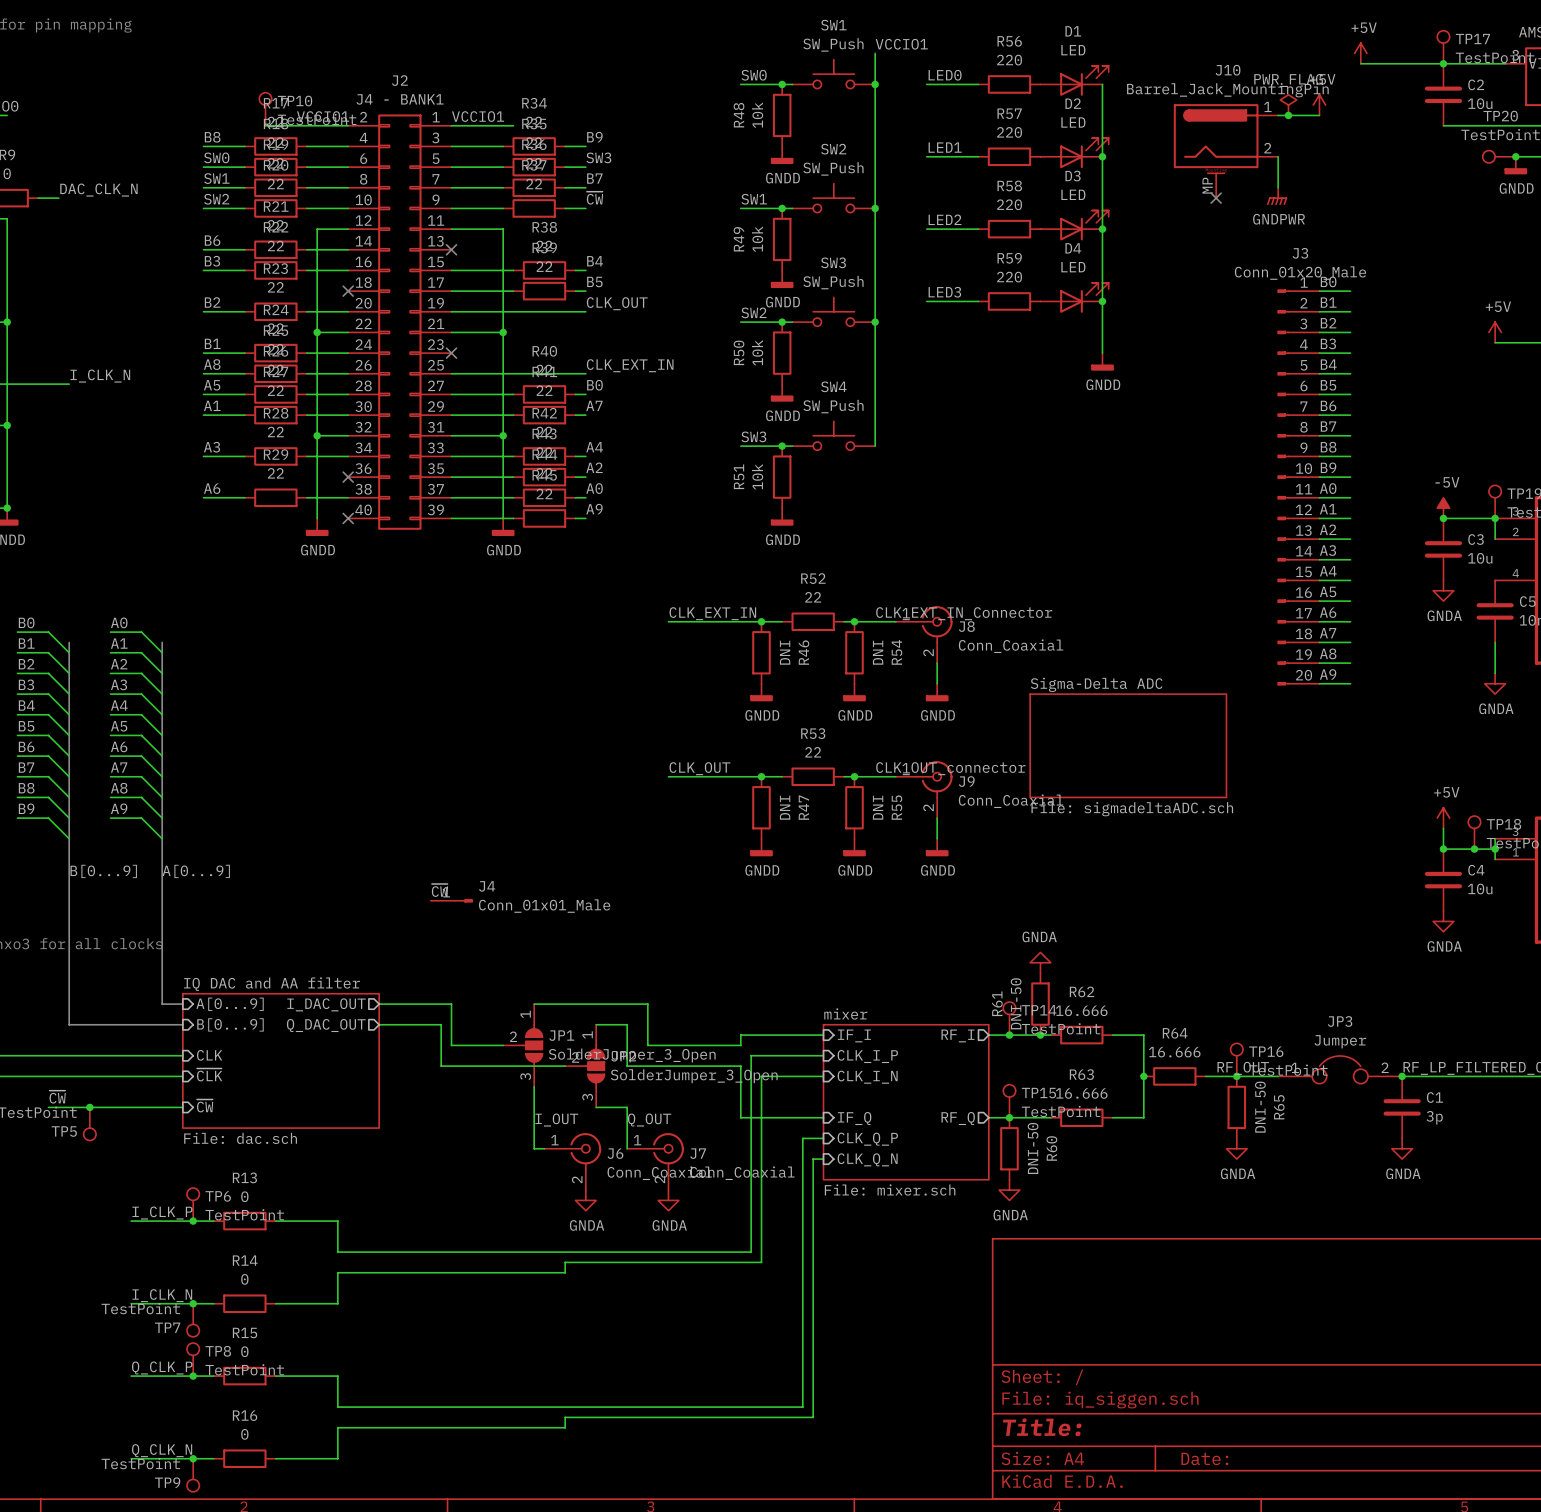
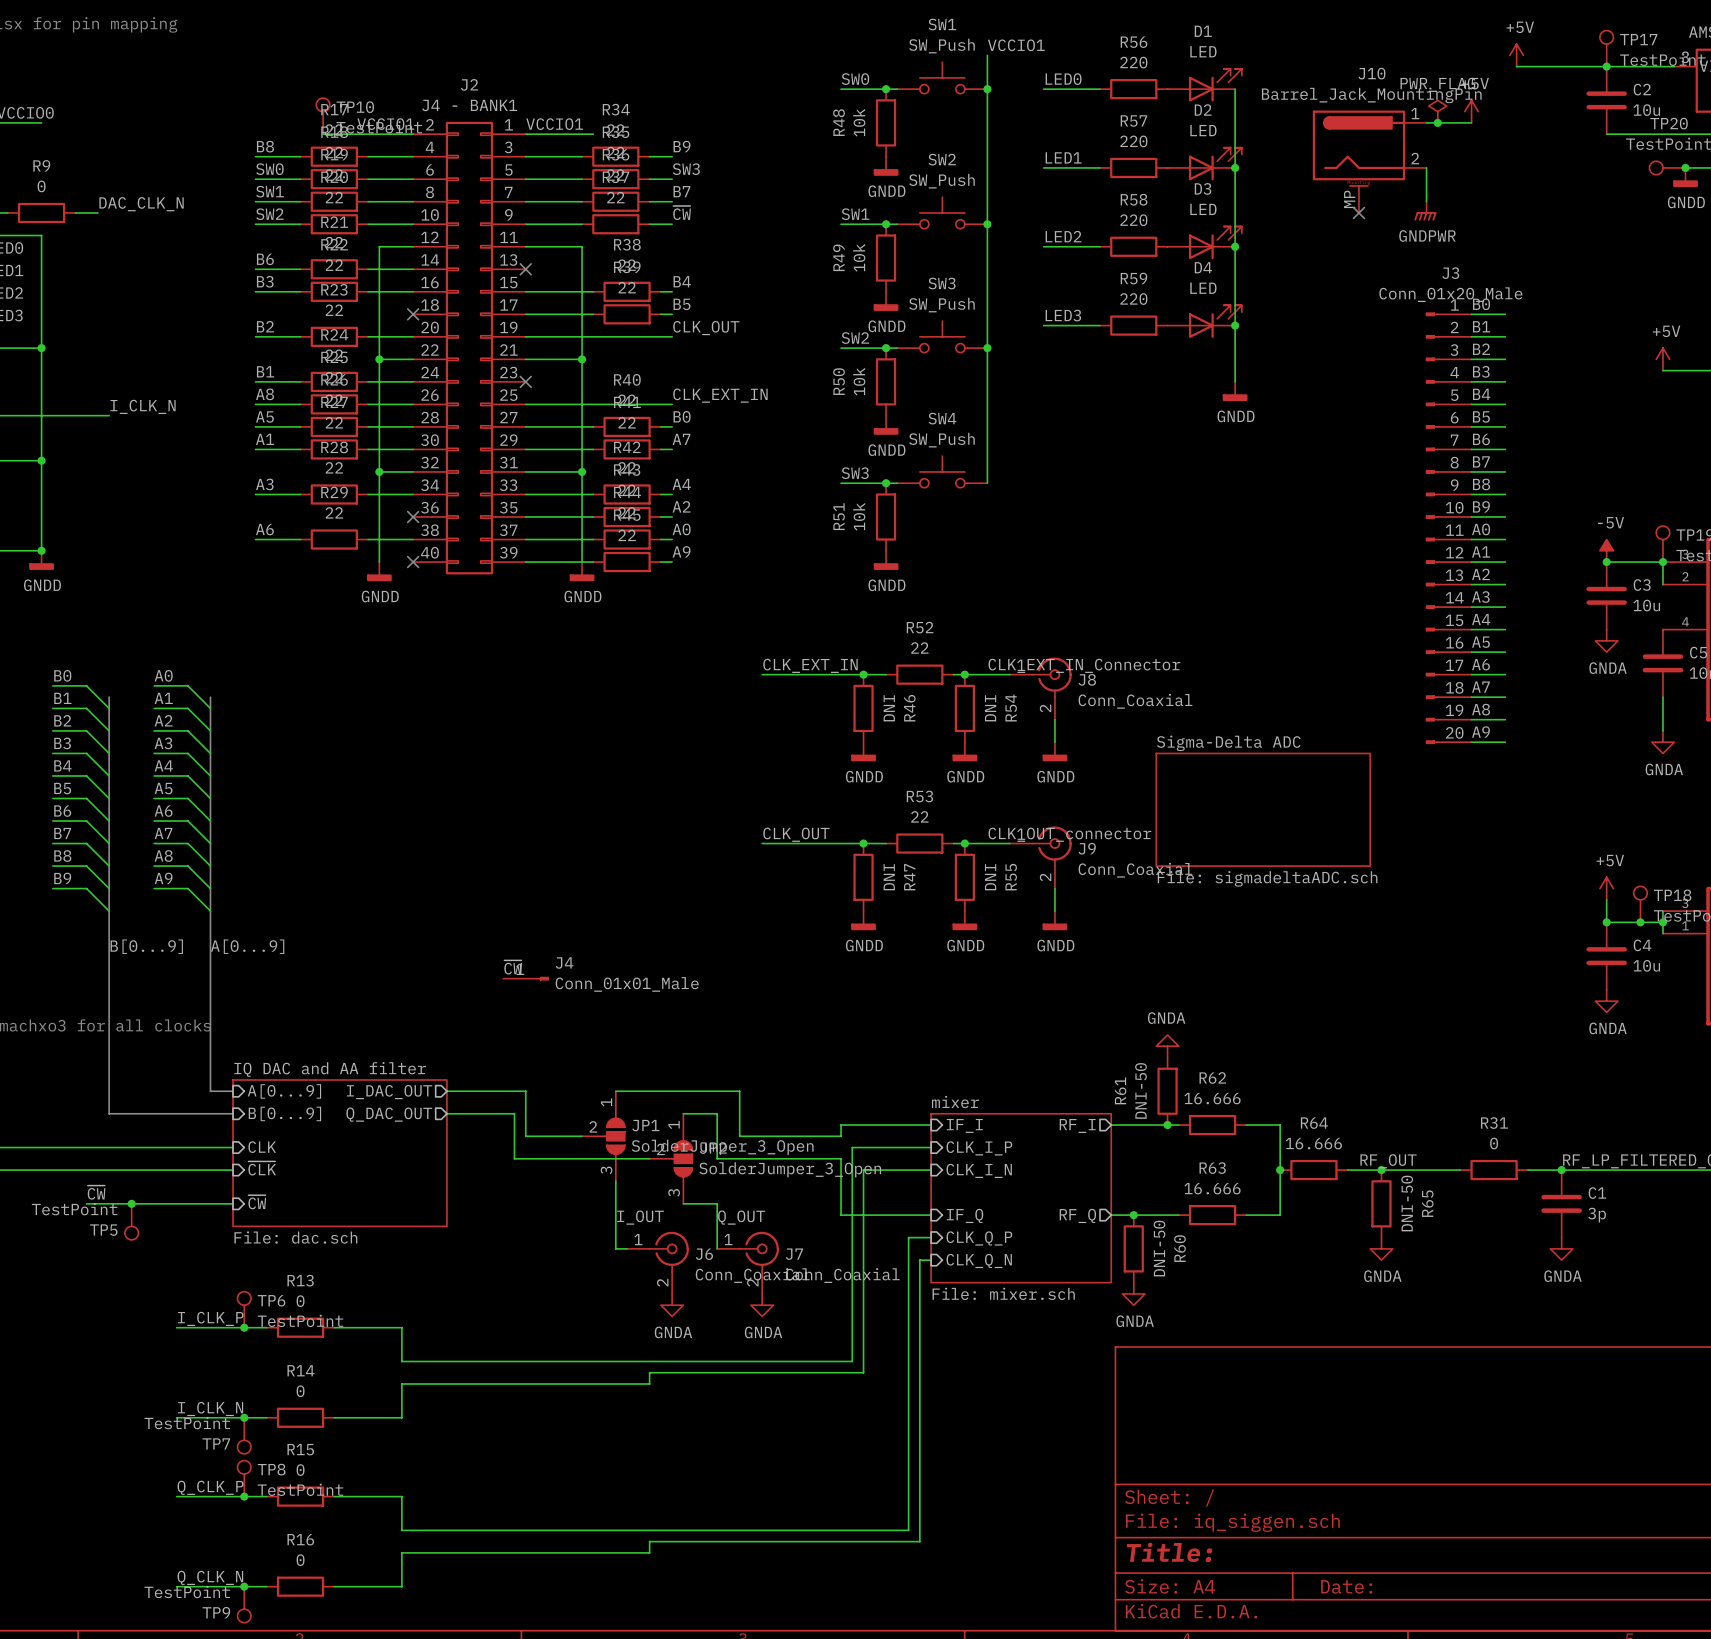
TP14: TestPoint (1009, 1018) -> none
junction: (1009, 1035) -> none
TP16: TestPoint (1236, 1059) -> none
JP3: Jumper (1340, 1069) -> none
R31: none -> 0 (1494, 1170)
TP15: TestPoint (1009, 1101) -> none

